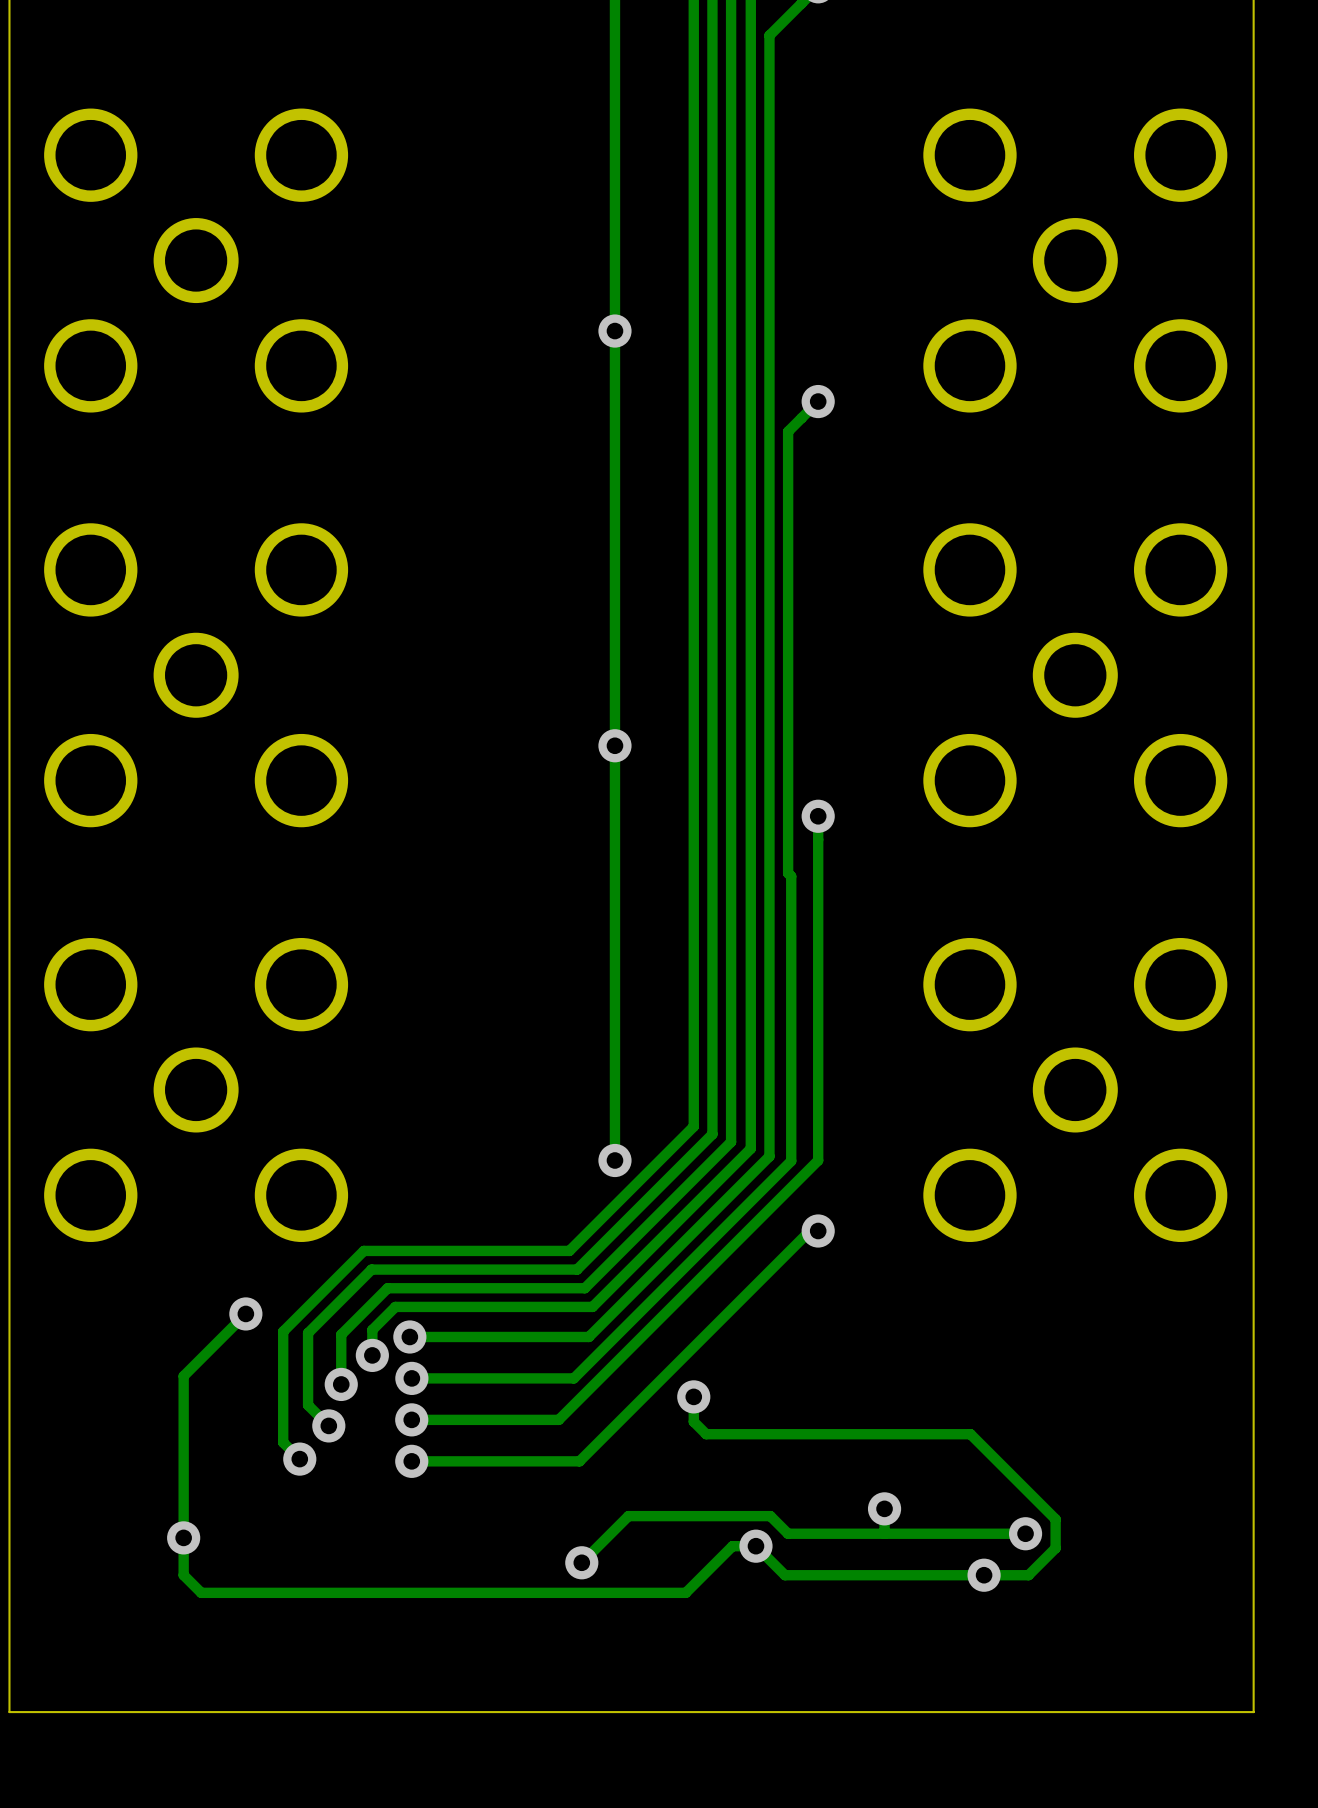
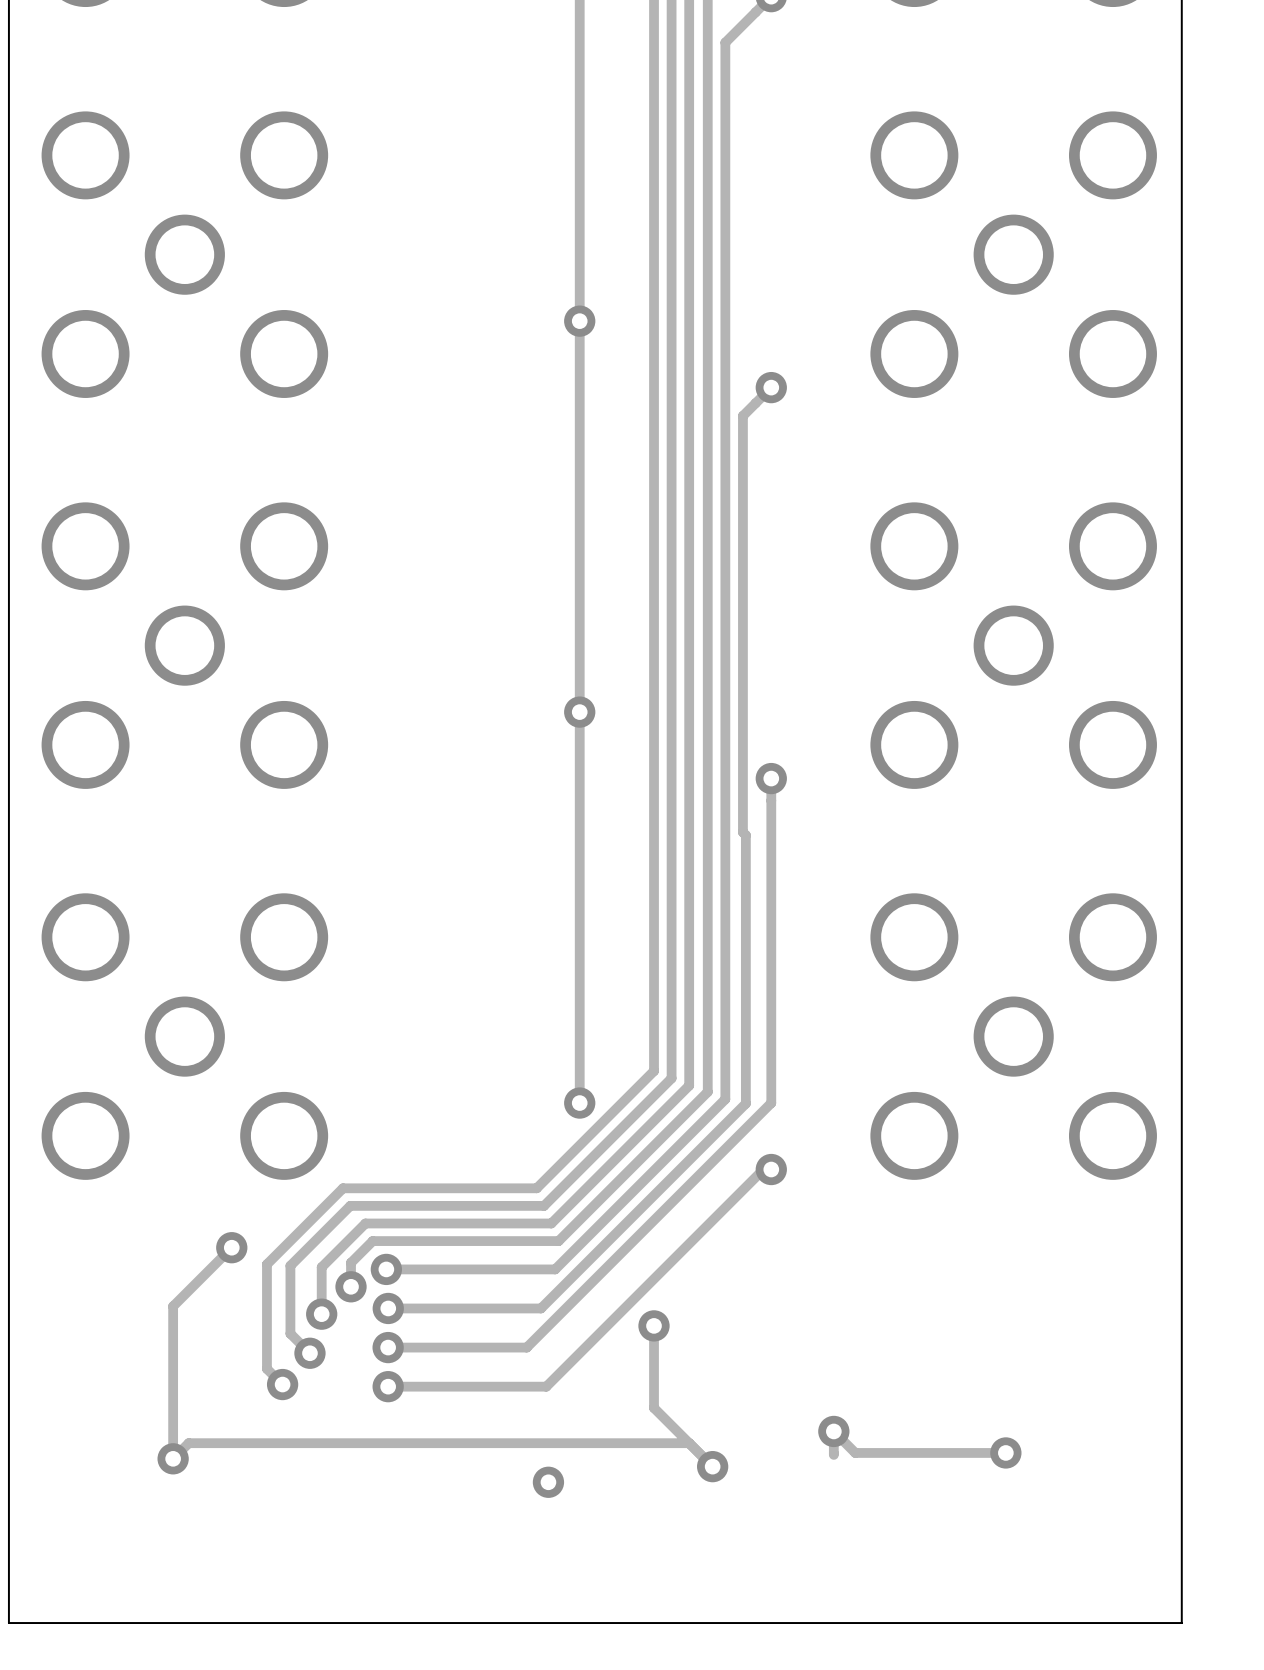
track: (693, 1421) (706, 1434) (970, 1434) (1055, 1519) (1055, 1548) (1028, 1575) (785, 1575) (755, 1546) (732, 1546) (685, 1592) (201, 1592) (183, 1575) (183, 1537) -> (689, 1443) (188, 1443) (173, 1458)
track: none -> (654, 1349) (654, 1407) (712, 1466)
track: none -> (833, 1431) (855, 1452) (1005, 1452)
track: (1025, 1533) (788, 1533) (770, 1516) (628, 1516) (581, 1562) -> none
via position: (1025, 1533) -> (1005, 1452)
via: (984, 1575) -> none

